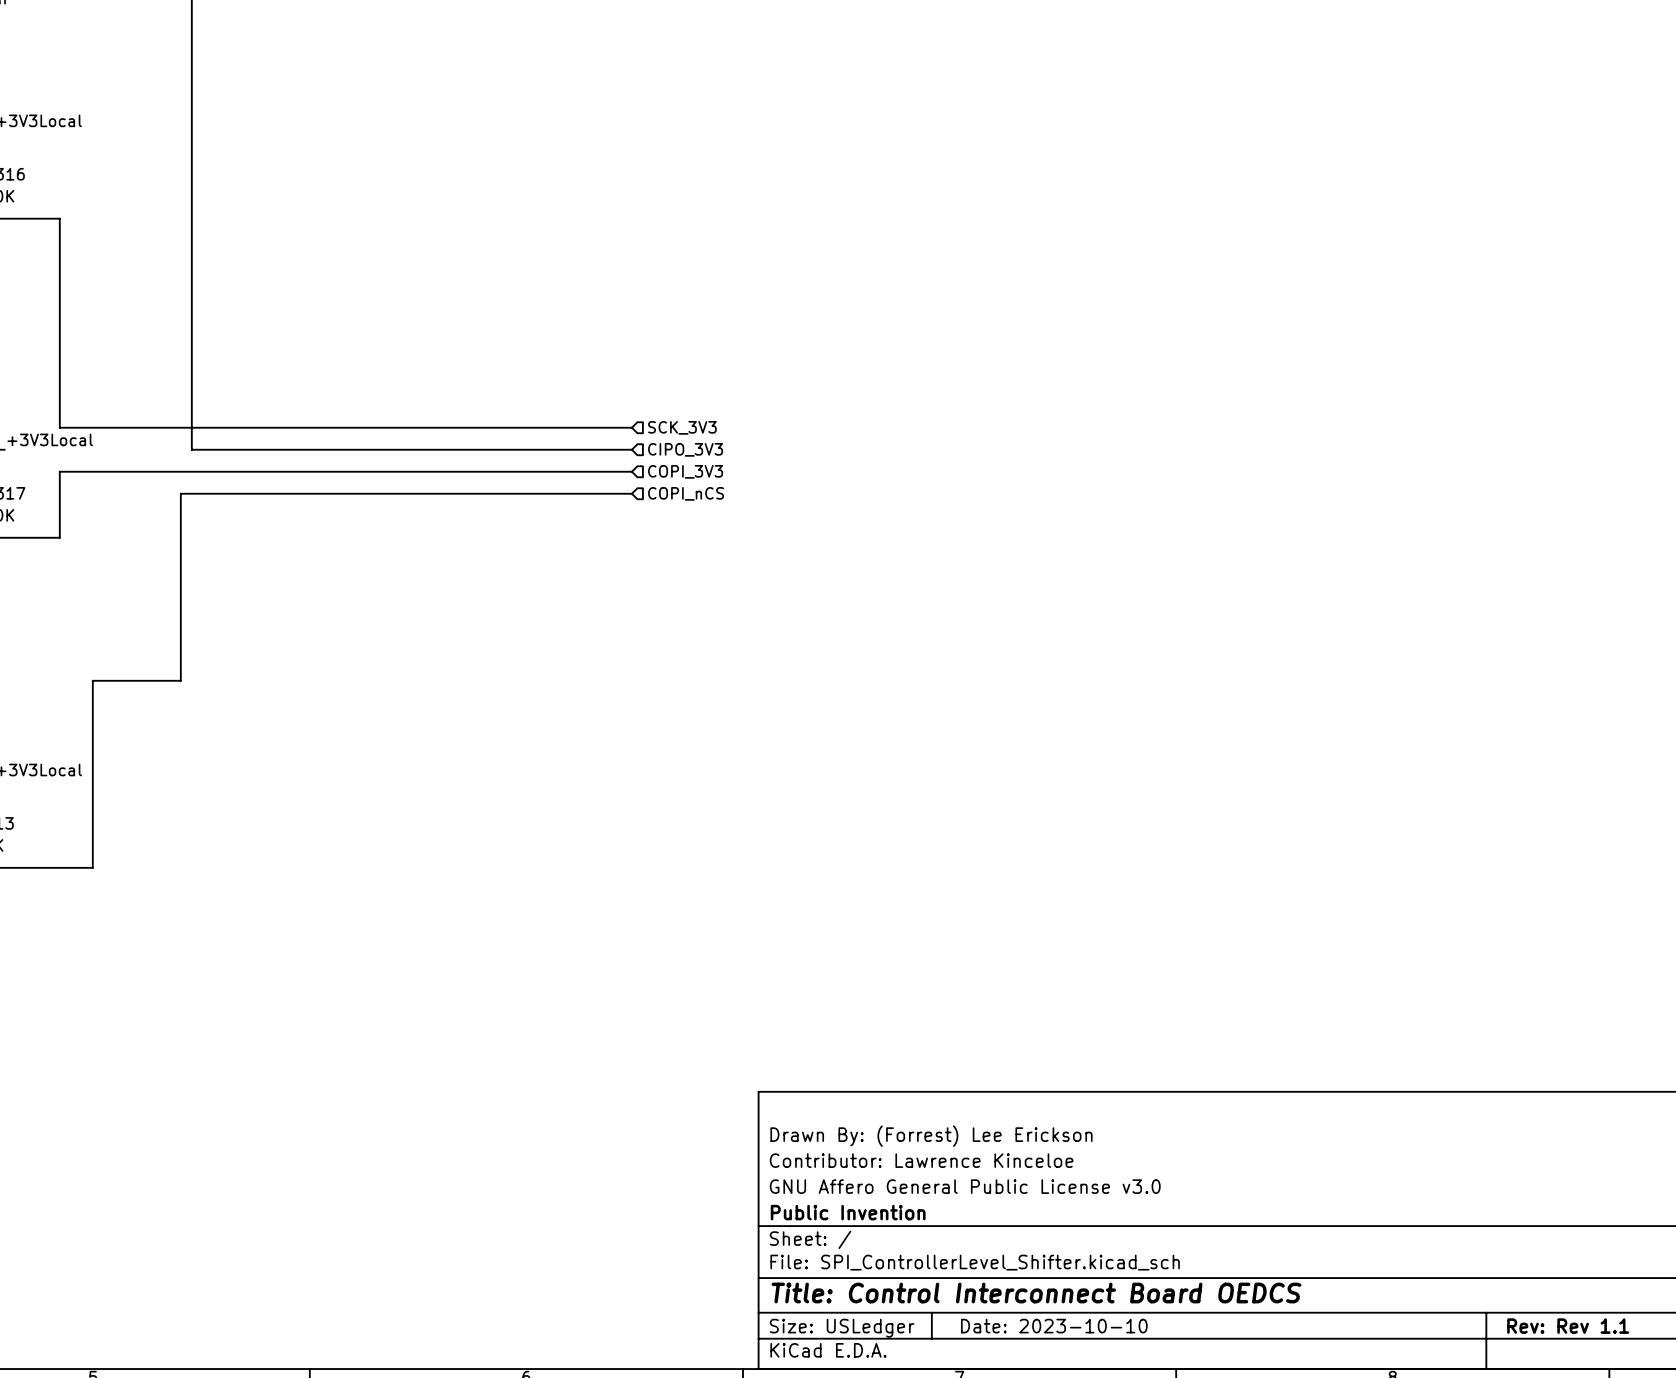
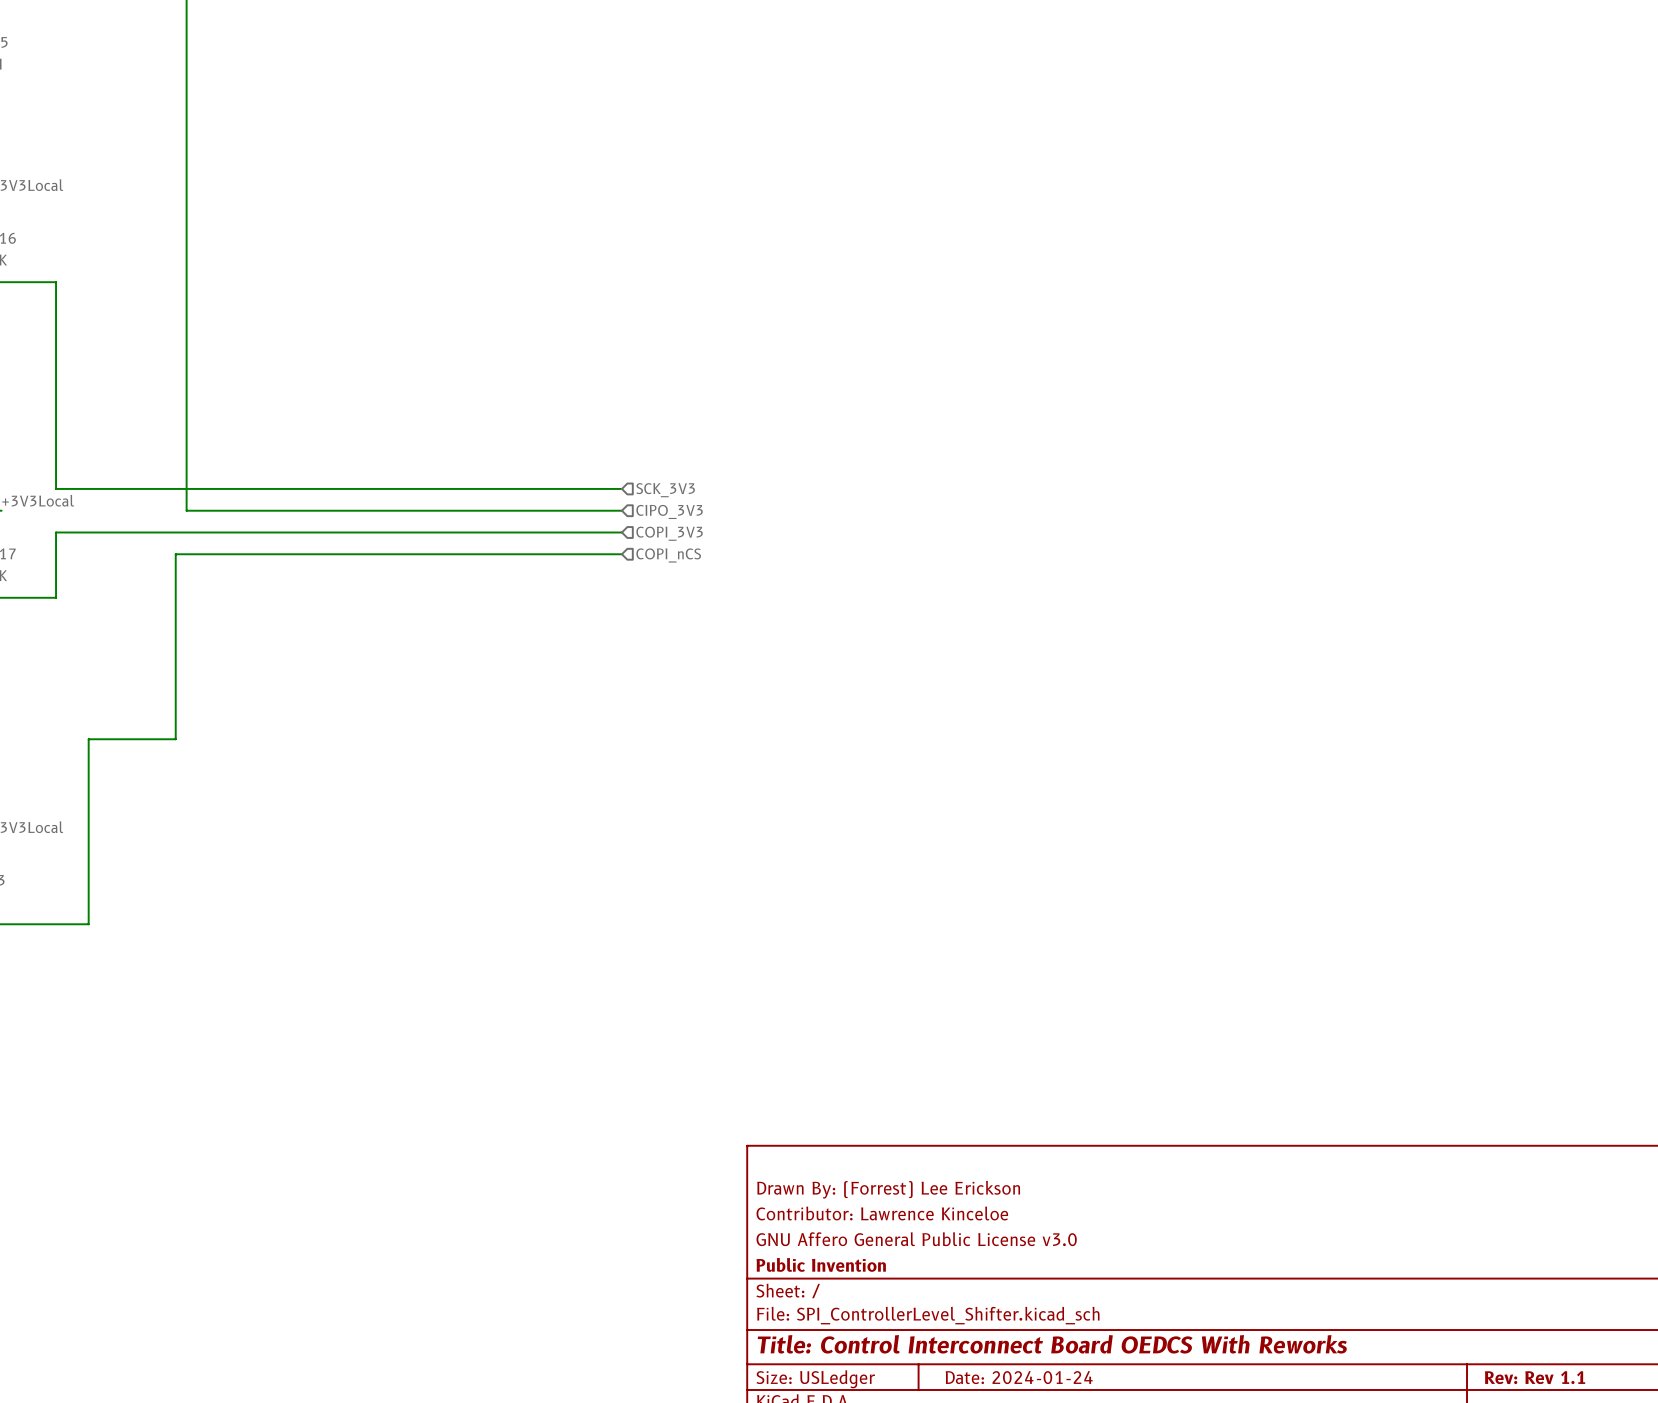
title block: Title: Control Interconnect Board OEDCS (1036, 1293) -> Title: Control Interconnect Board OEDCS With Reworks (1052, 1344)
title block: Date: 2023-10-10 (1054, 1326) -> Date: 2024-01-24 (1019, 1377)

